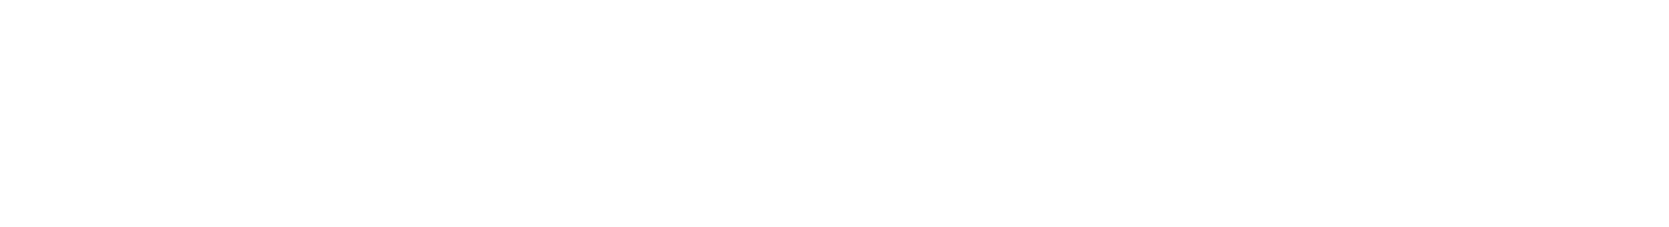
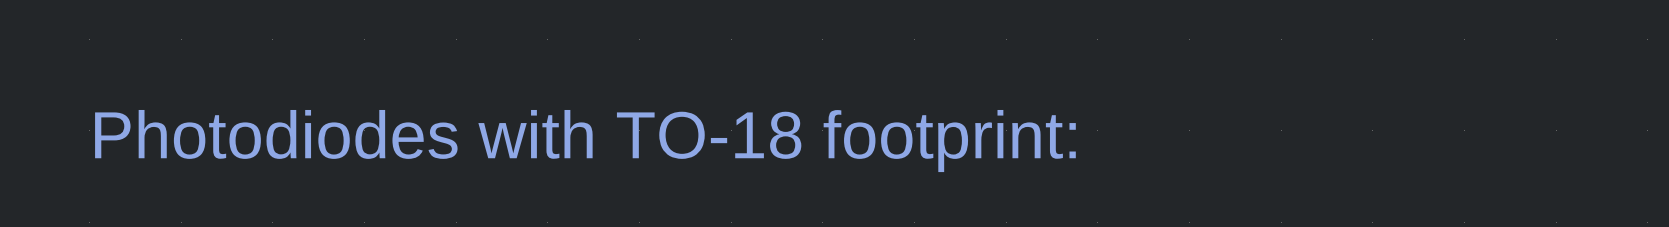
text: none -> Photodiodes with TO-18 footprint: (585, 141)

